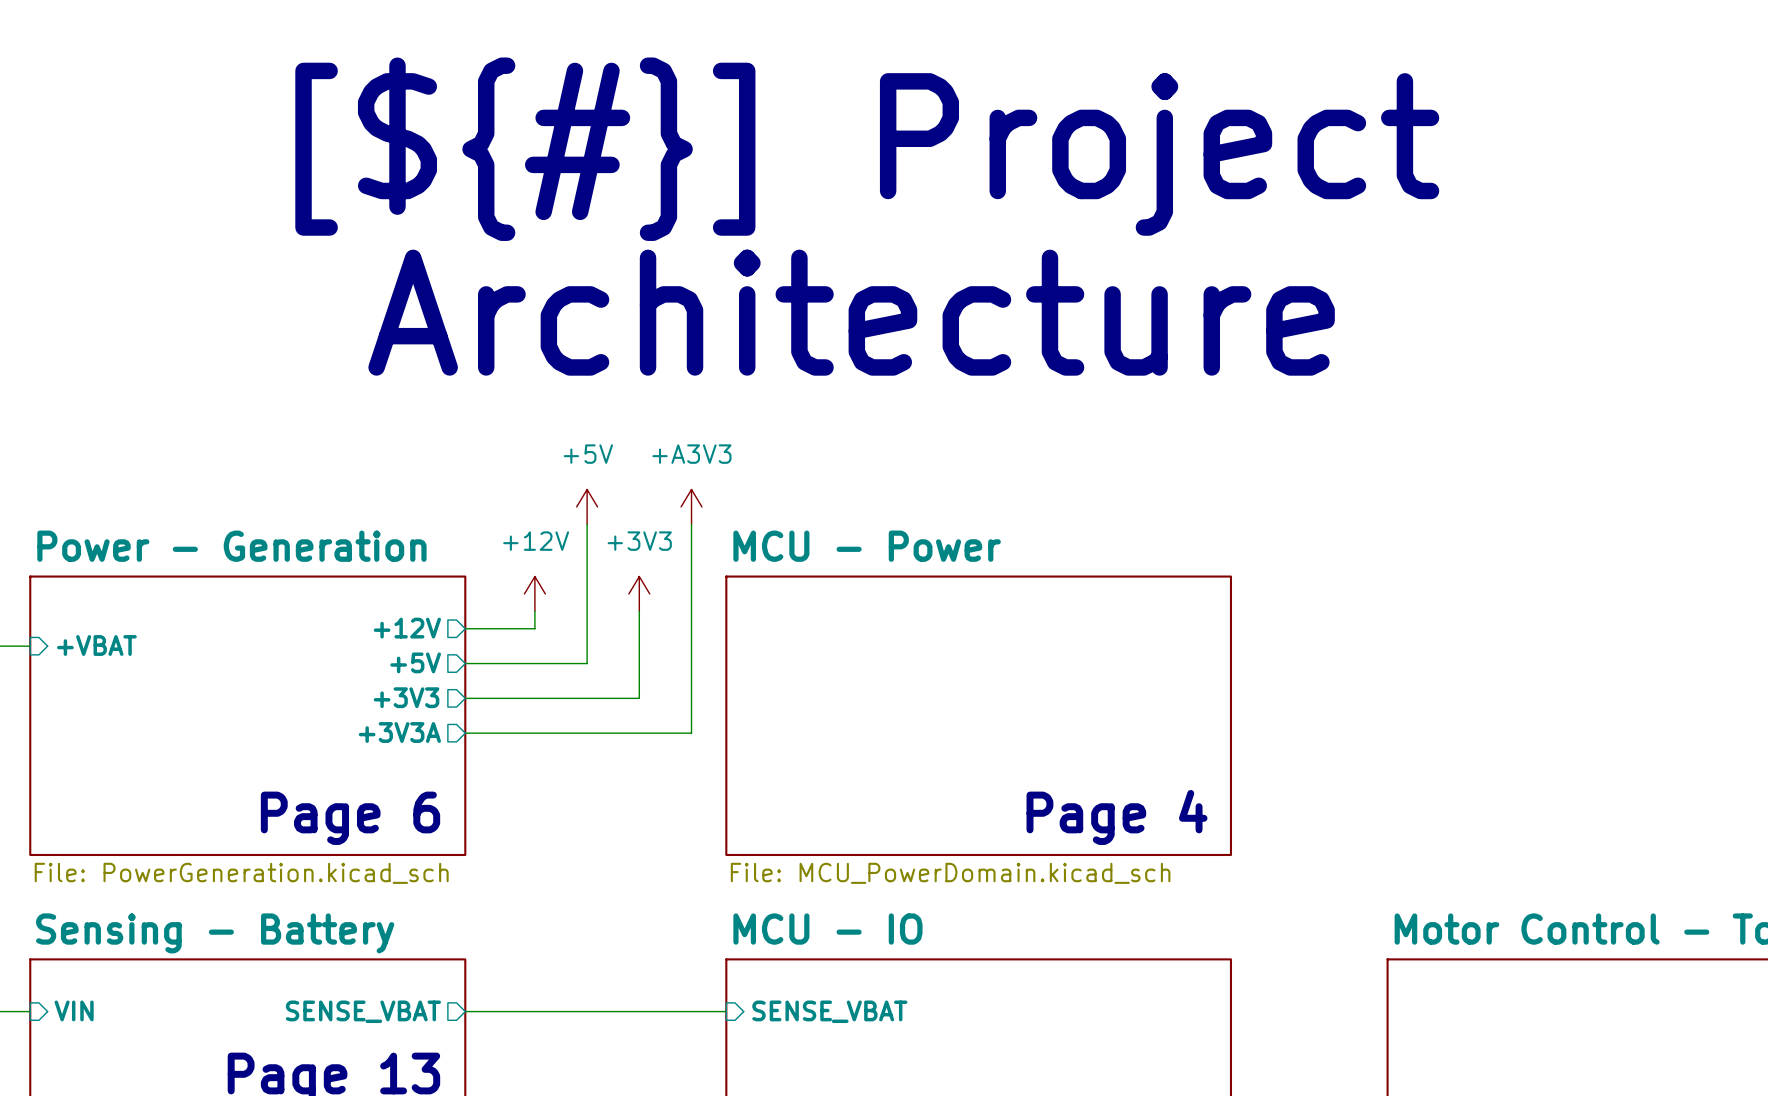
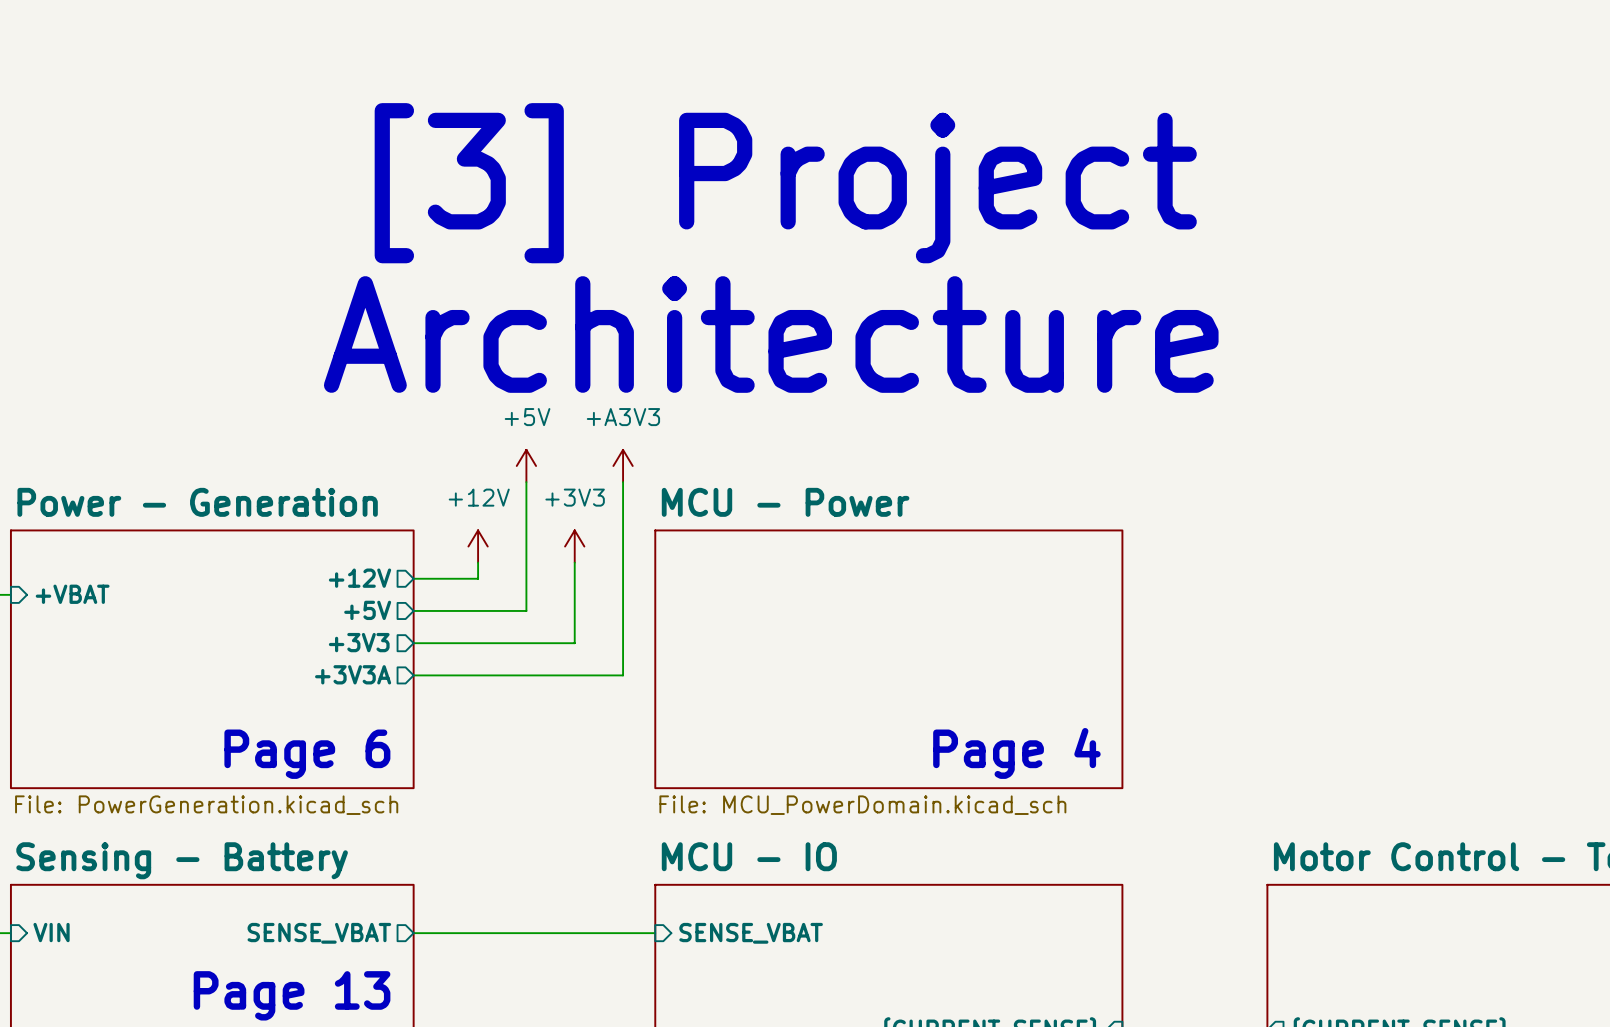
text: [${#}] Project (867, 149) -> [3] Project (785, 183)
text position: Architecture (851, 312) -> Architecture (771, 334)

